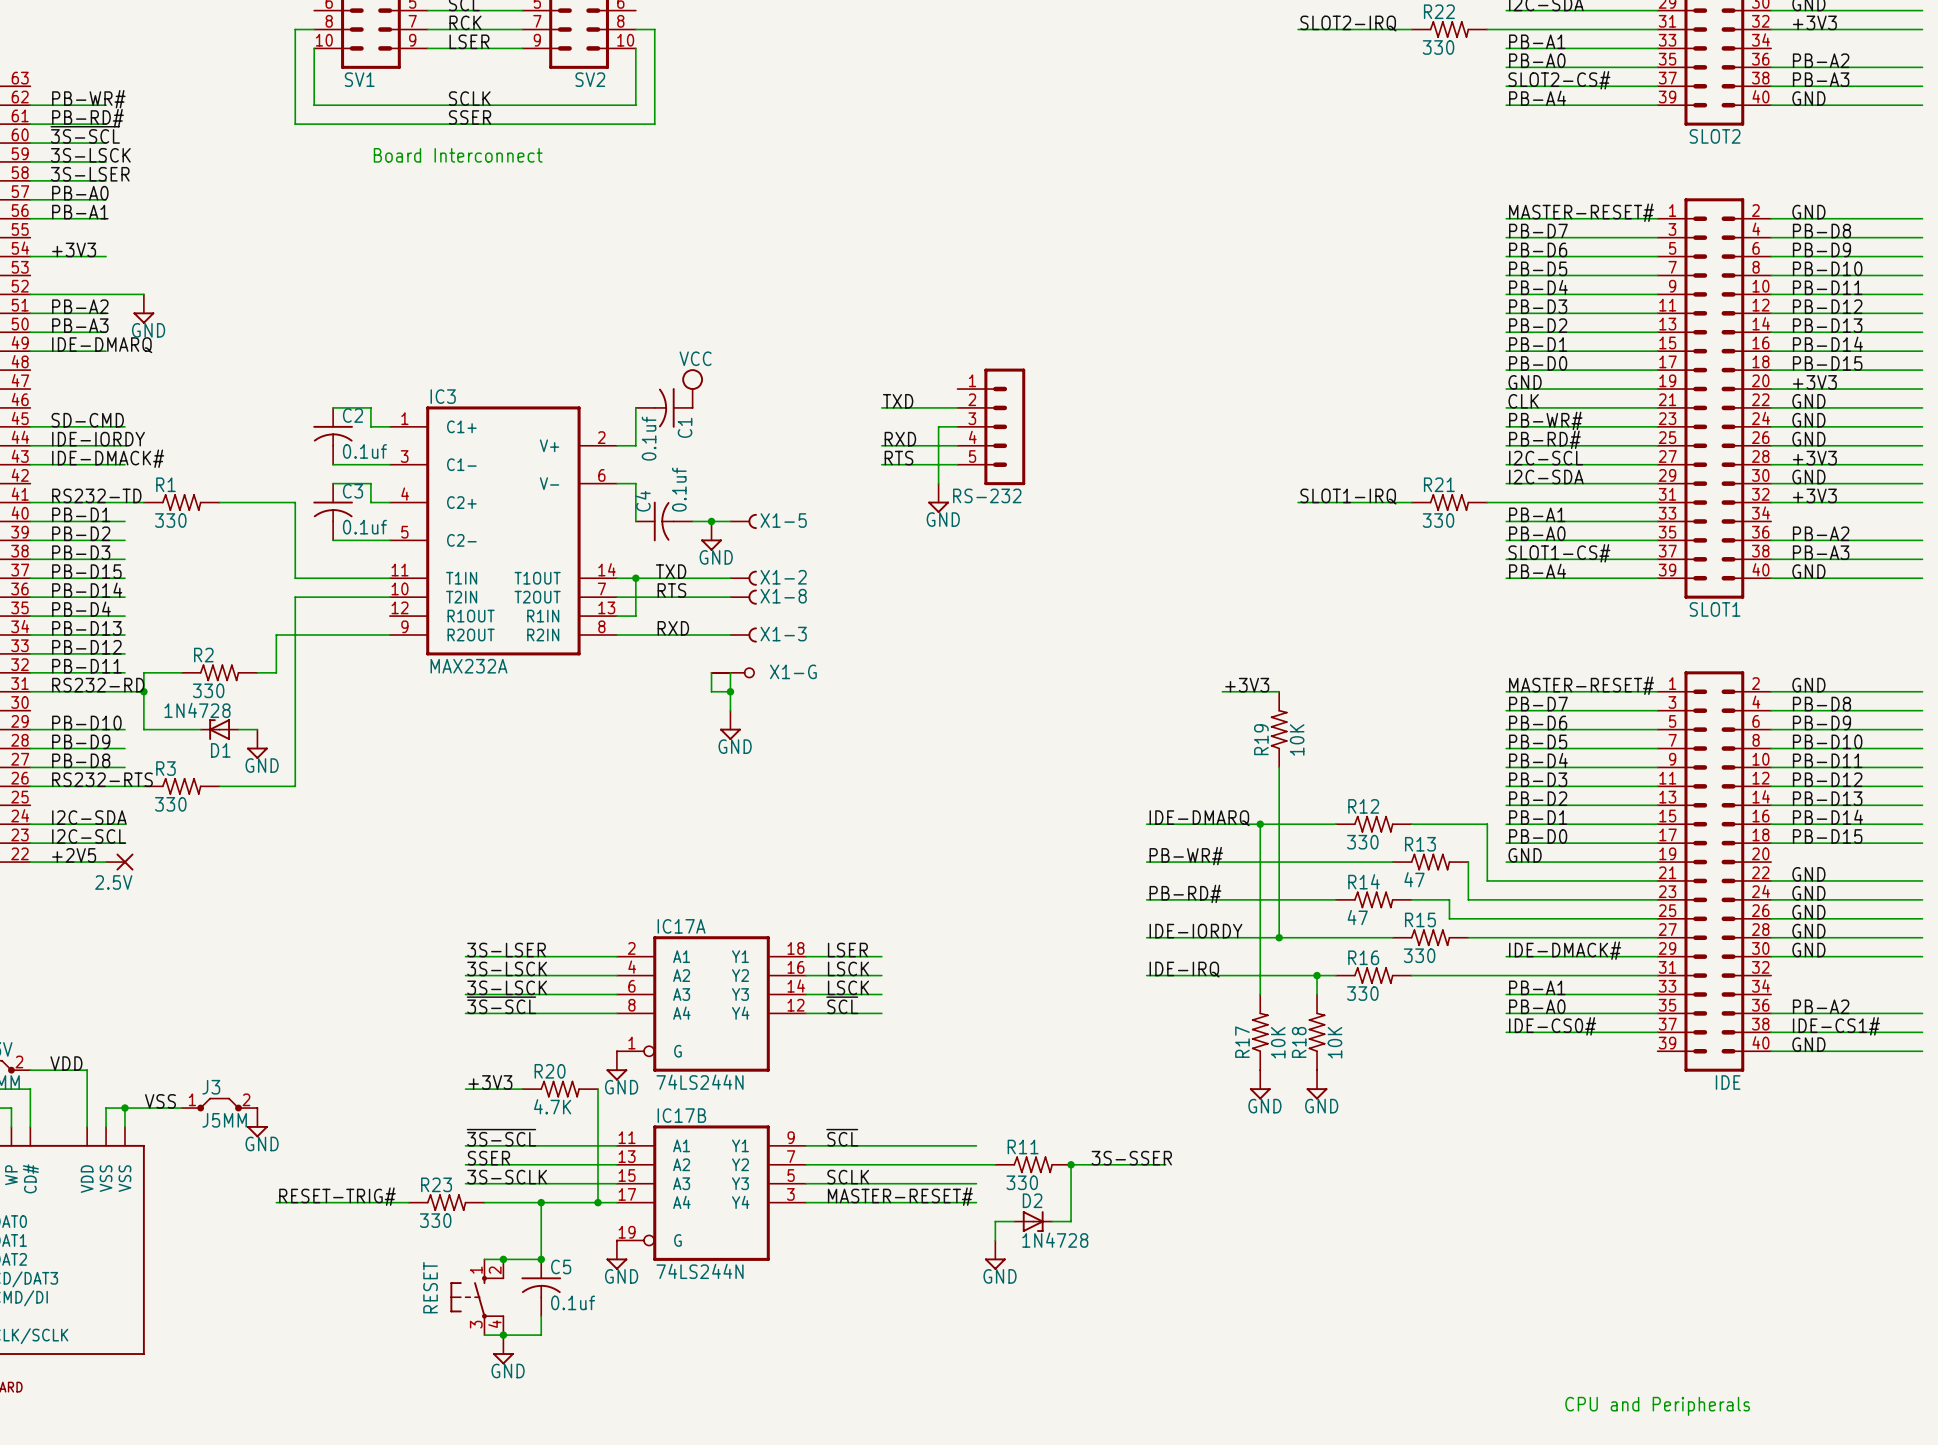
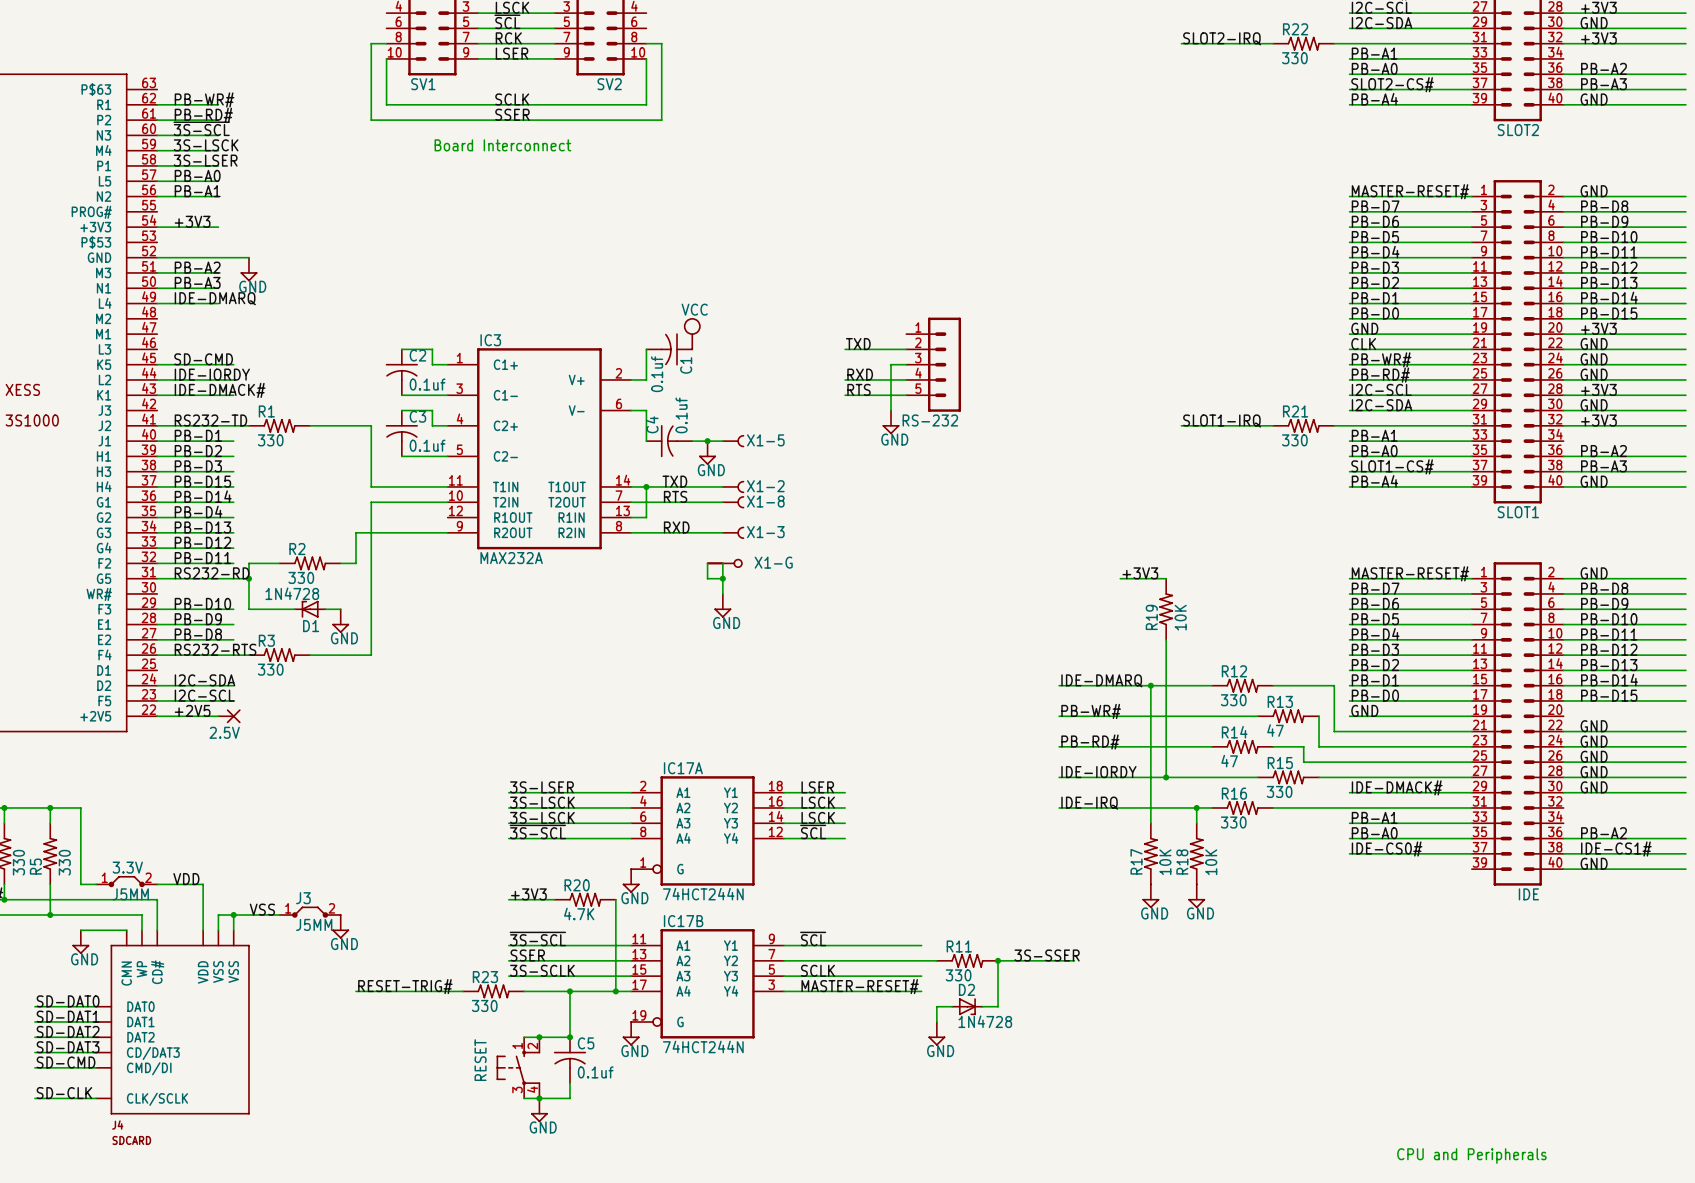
IC17A value: 74LS244N (700, 1082) -> 74HCT244N (703, 894)
IC17B value: 74LS244N (700, 1271) -> 74HCT244N (703, 1046)

